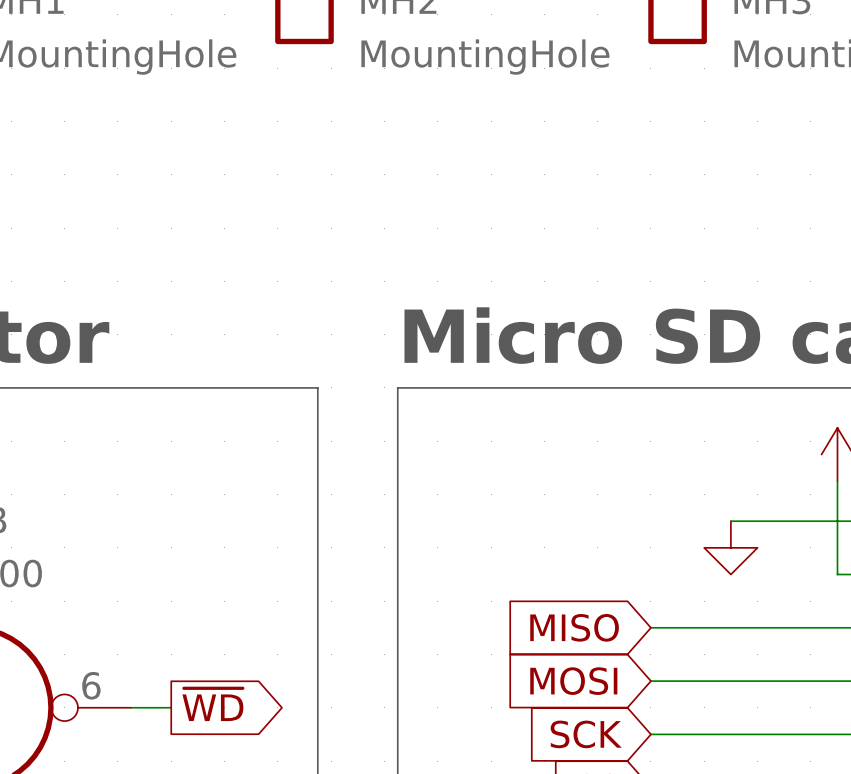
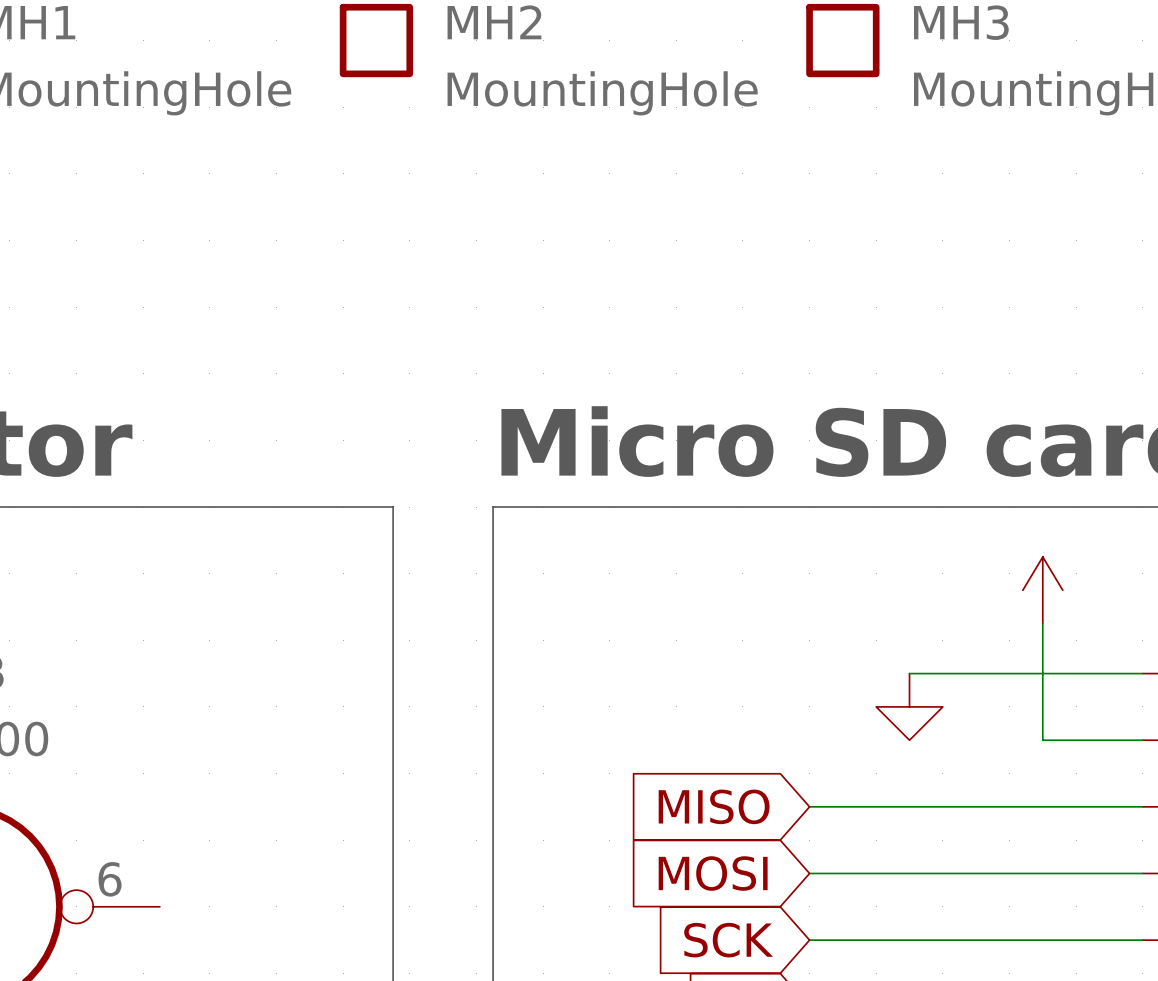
global label: ~{WD} (212, 704) -> none
wire: (131, 707) (171, 707) -> none

